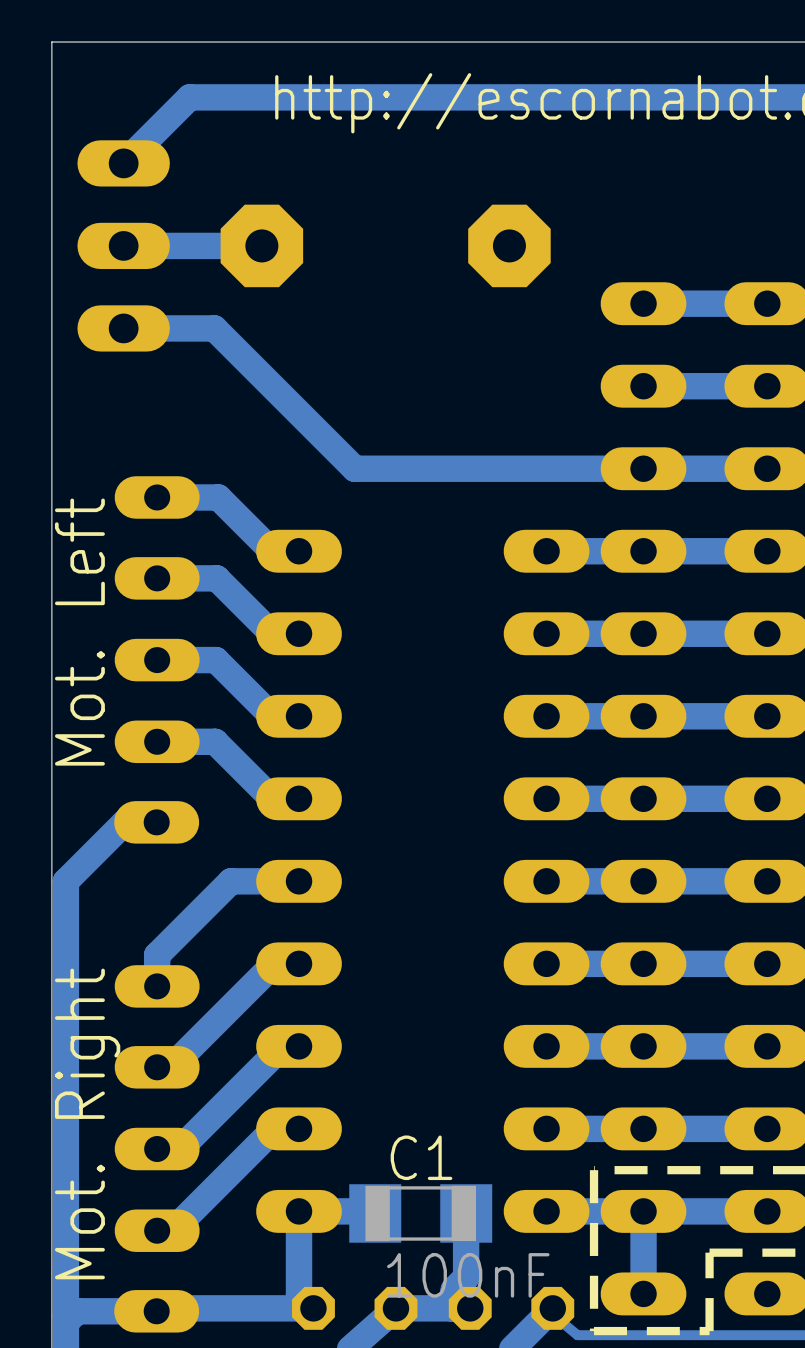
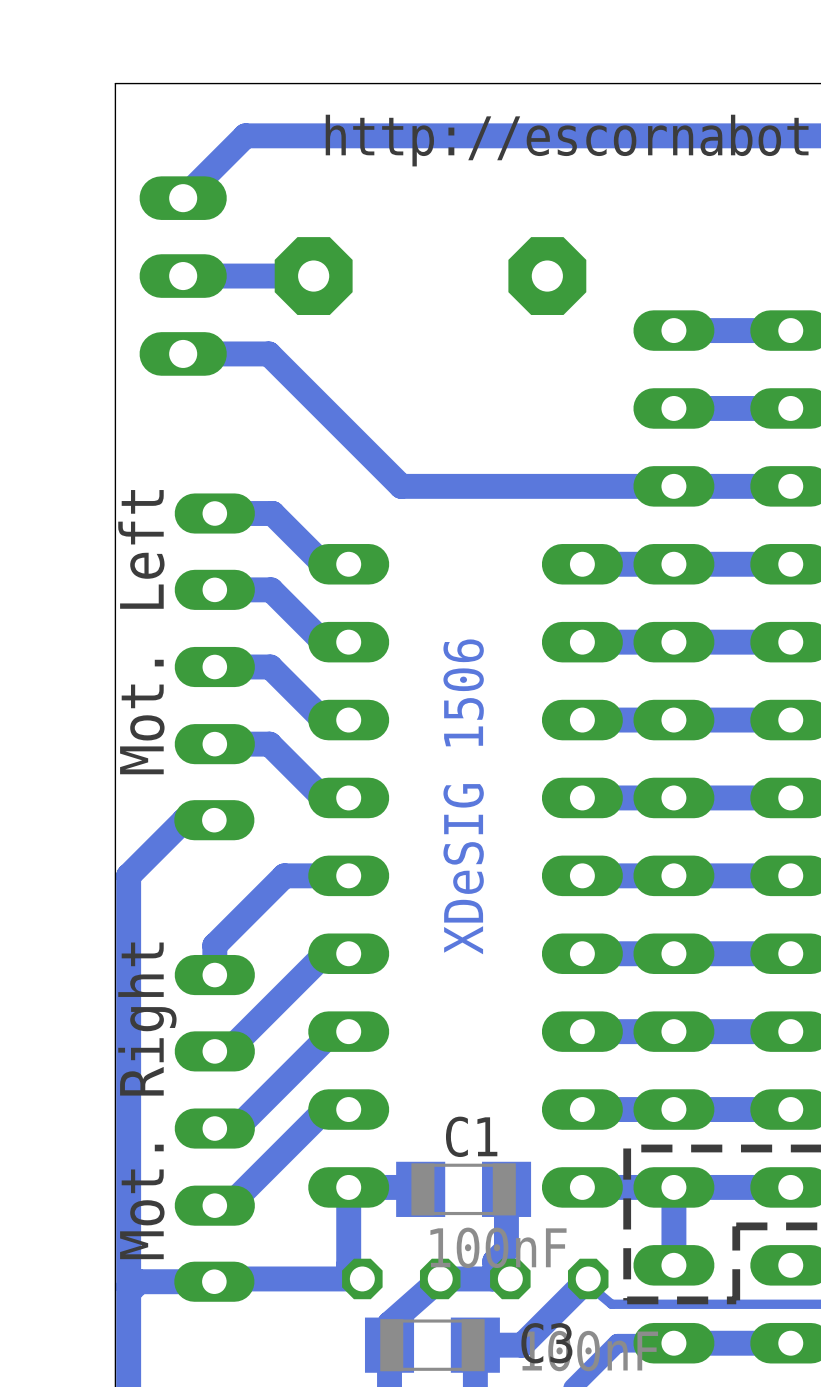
text: none -> XDeSIG 1506 (463, 796)

